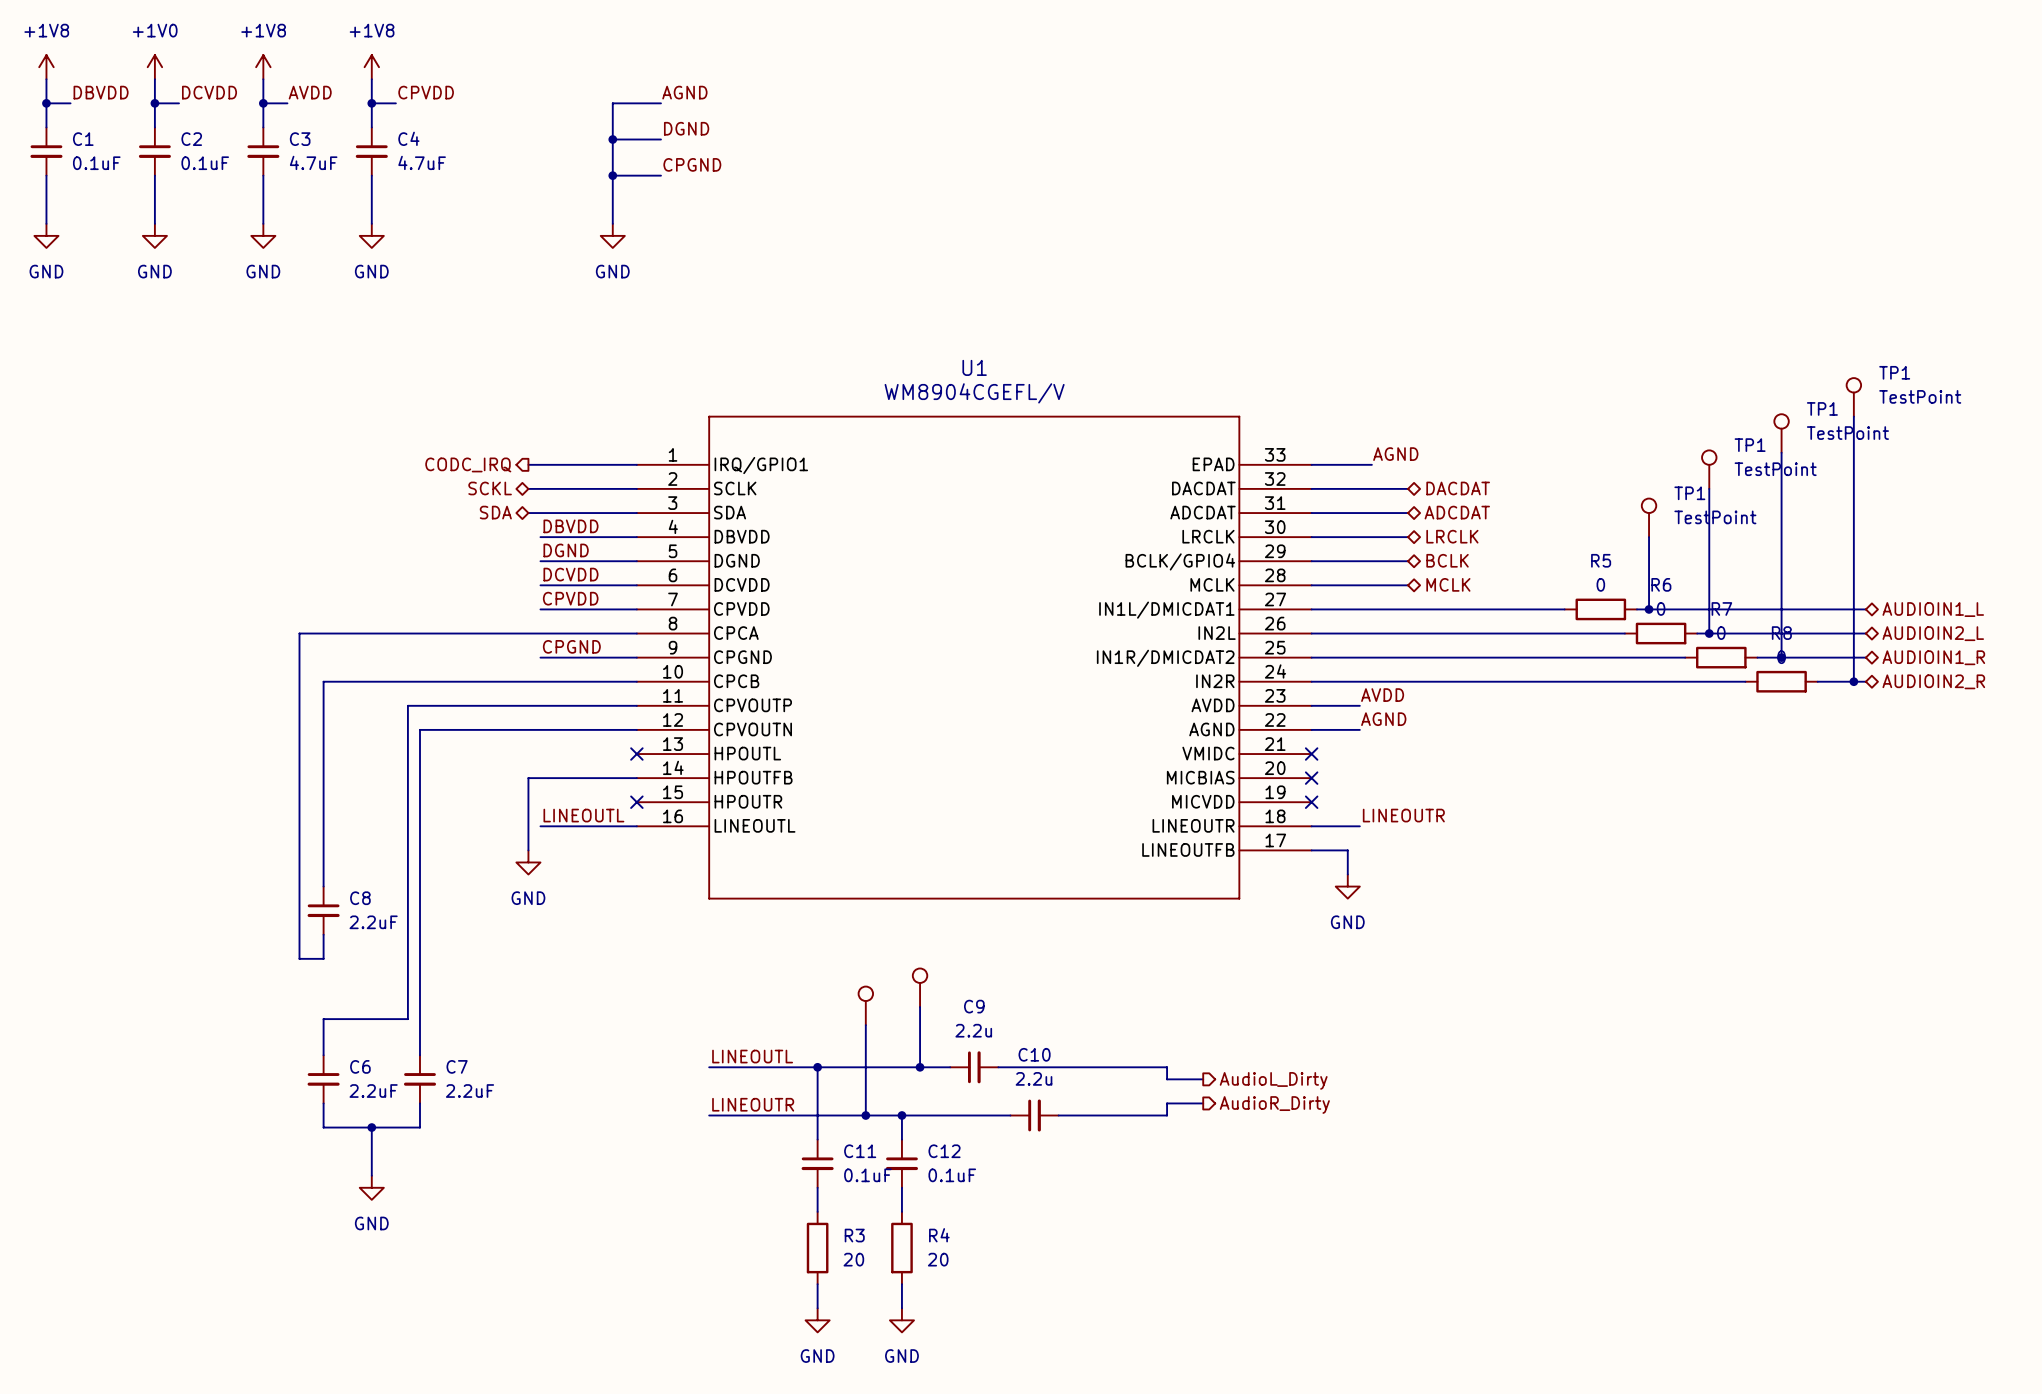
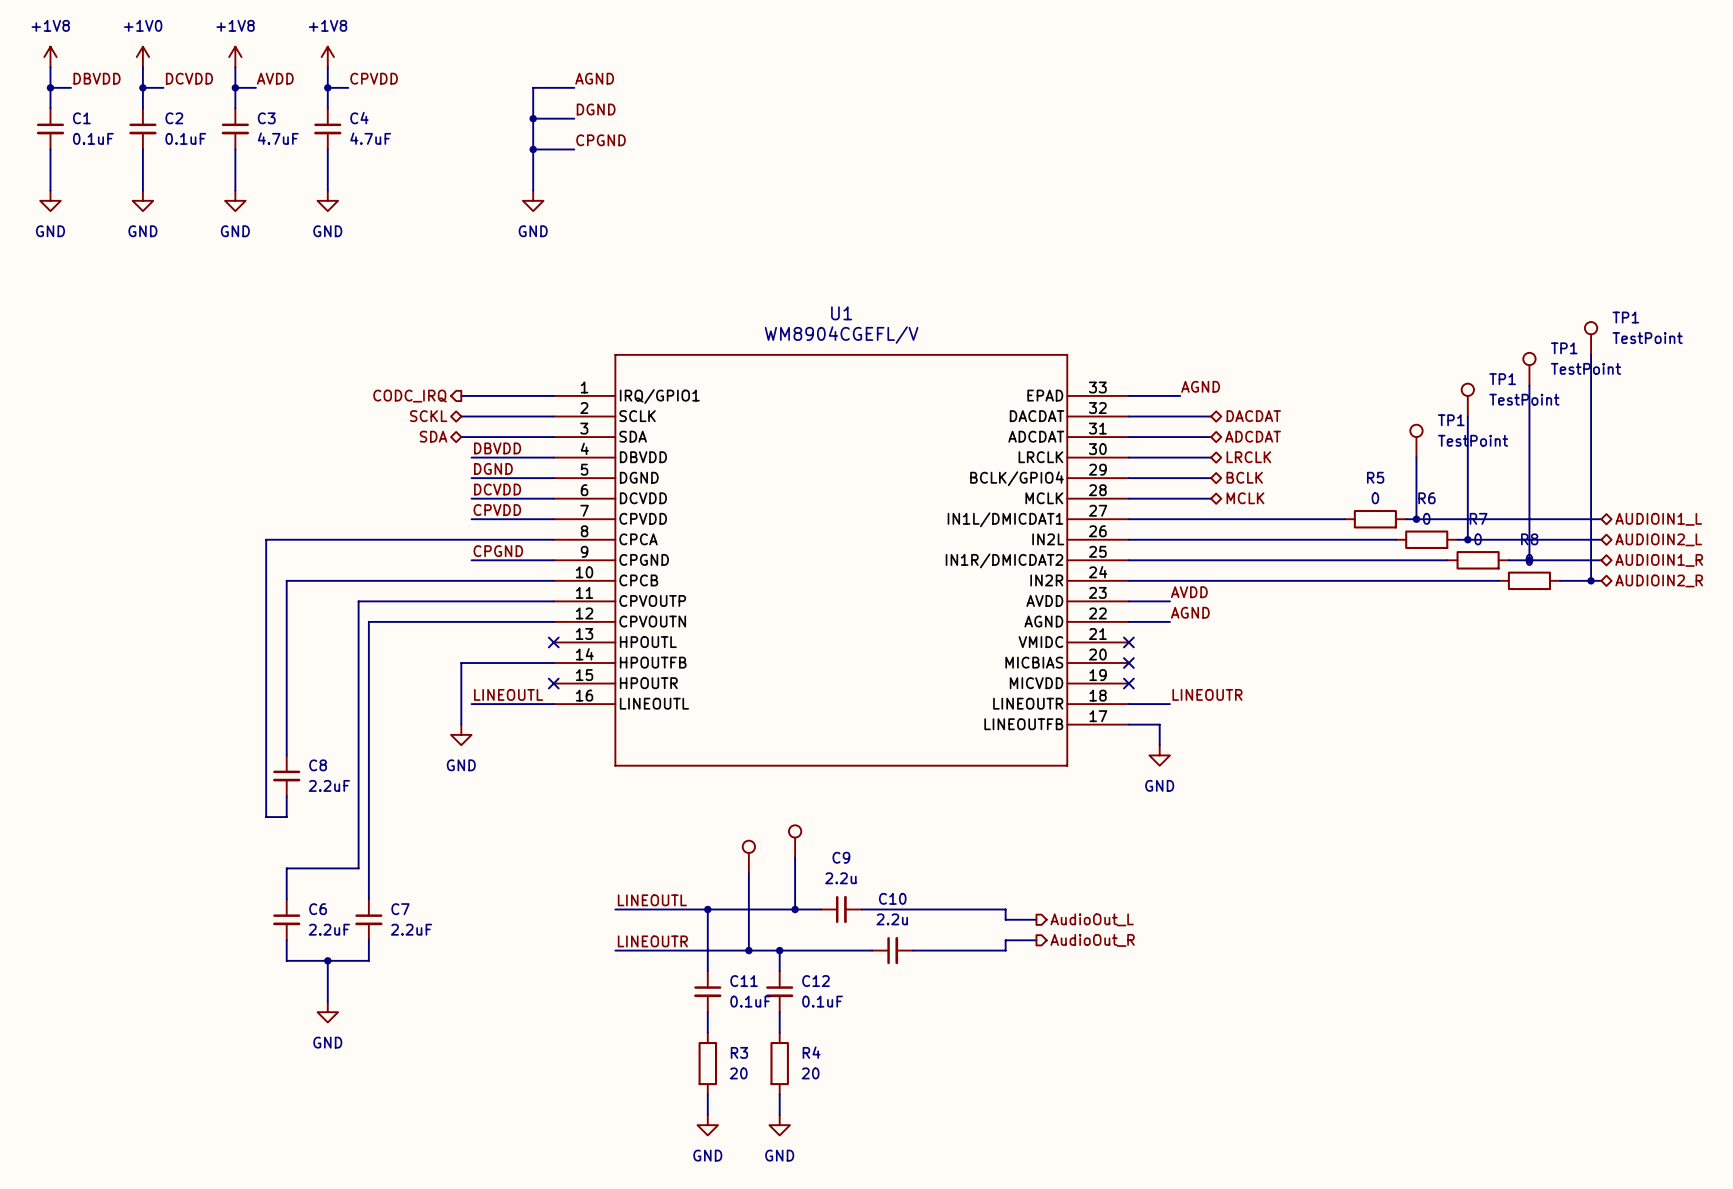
hierarchical label: AudioL_Dirty (1273, 1080) -> AudioOut_L (1092, 919)
hierarchical label: AudioR_Dirty (1274, 1105) -> AudioOut_R (1092, 940)

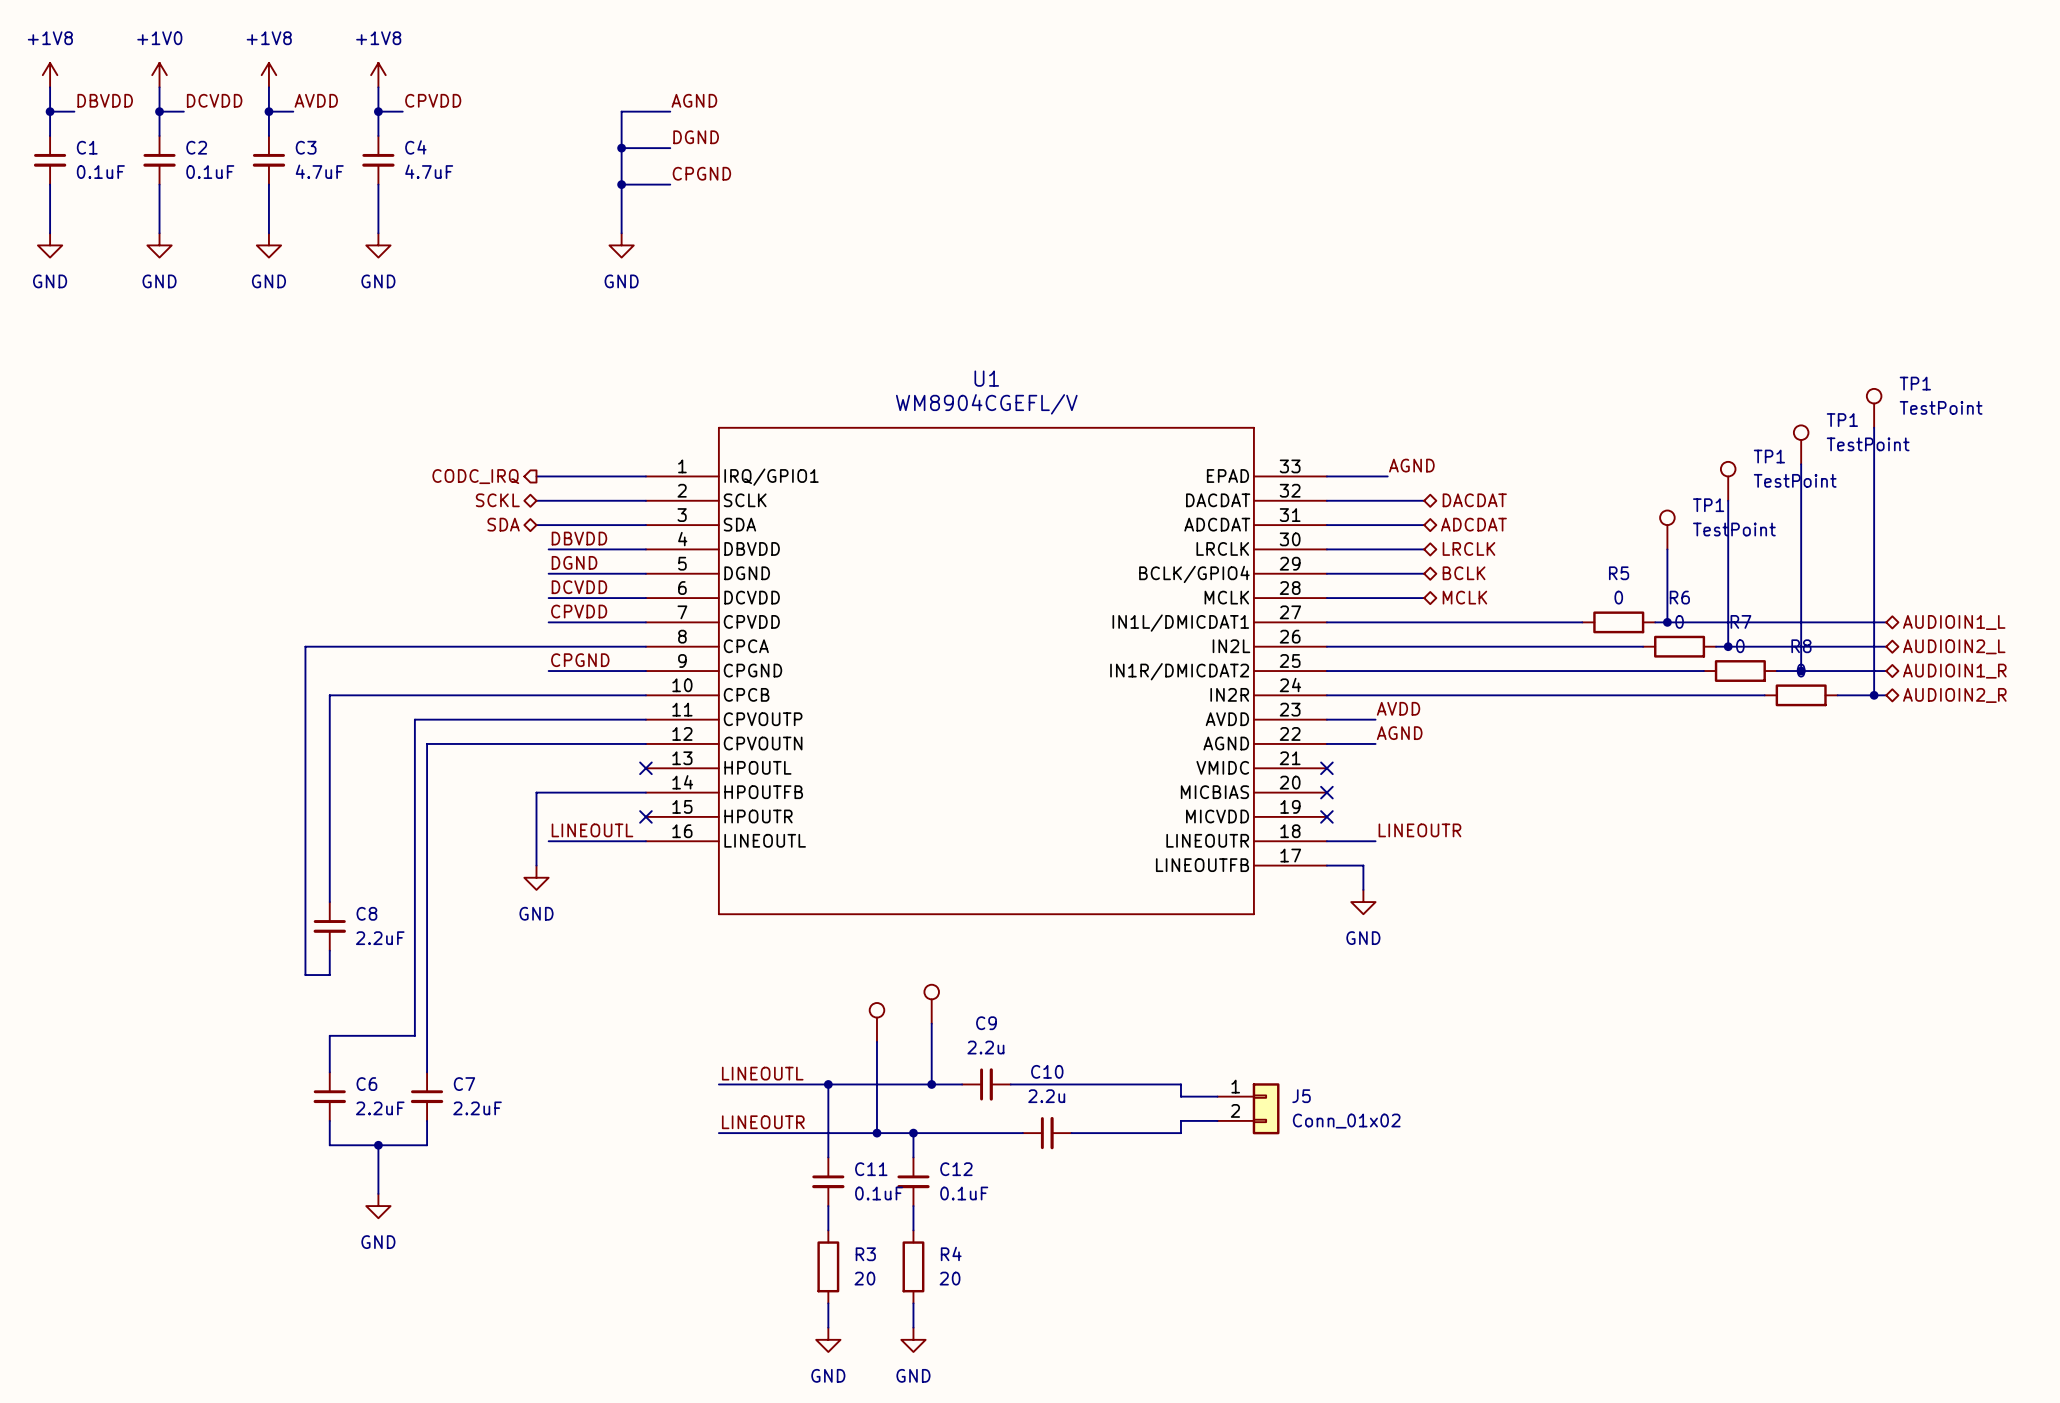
hierarchical label: AudioOut_L (1092, 919) -> none
J5: none -> Conn_01x02 (1248, 1108)
hierarchical label: AudioOut_R (1092, 940) -> none

